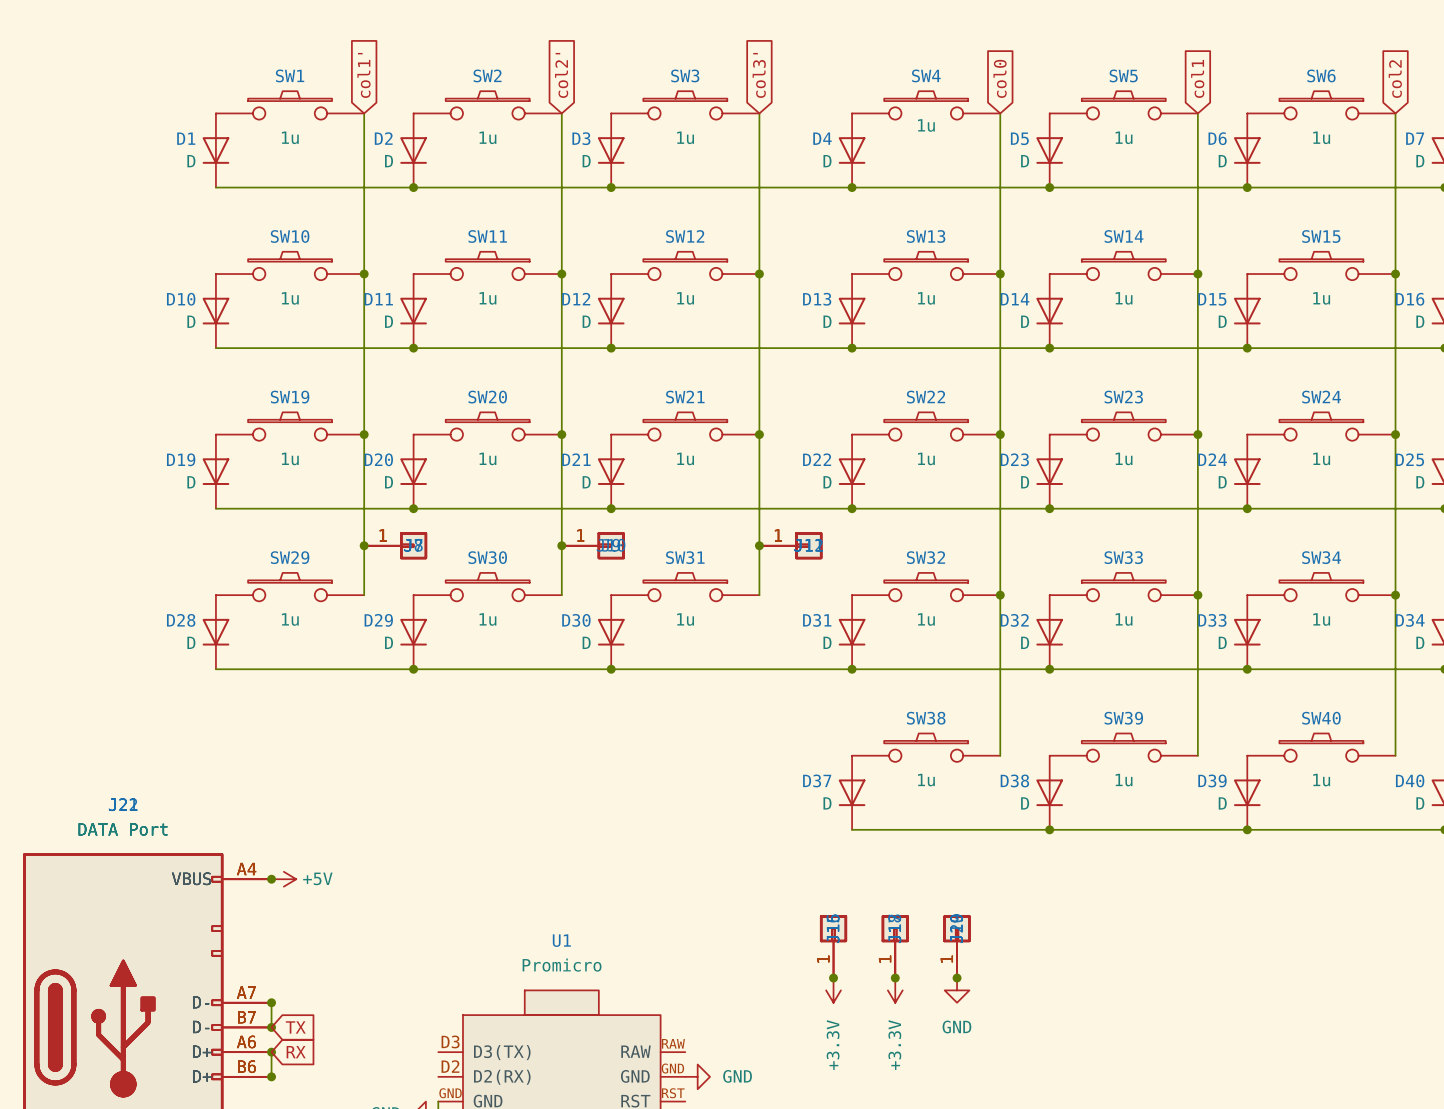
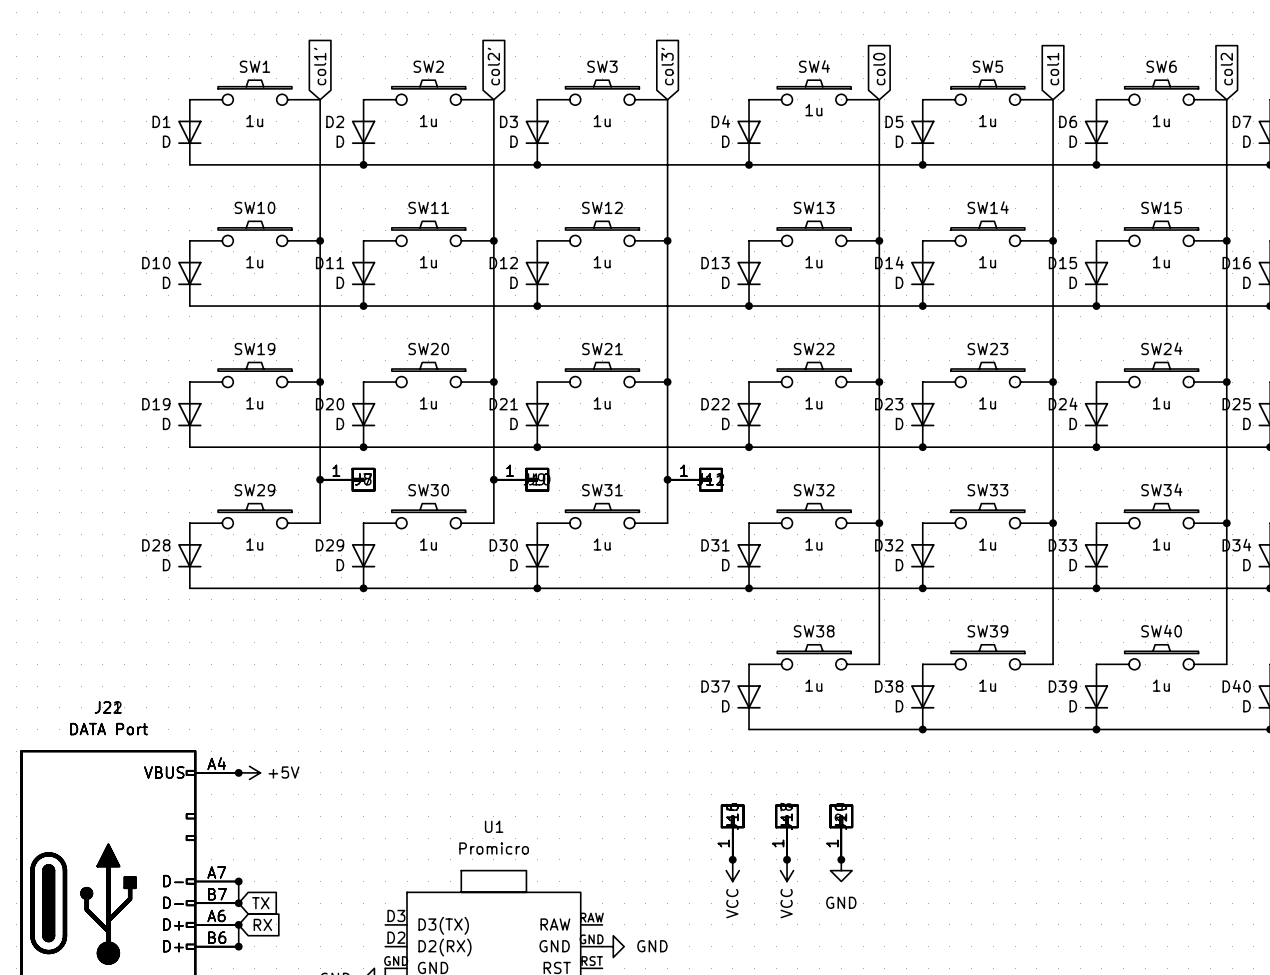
power symbol: +3.3V (833, 990) -> VCC (732, 870)
power symbol: +3.3V (895, 990) -> VCC (787, 870)

